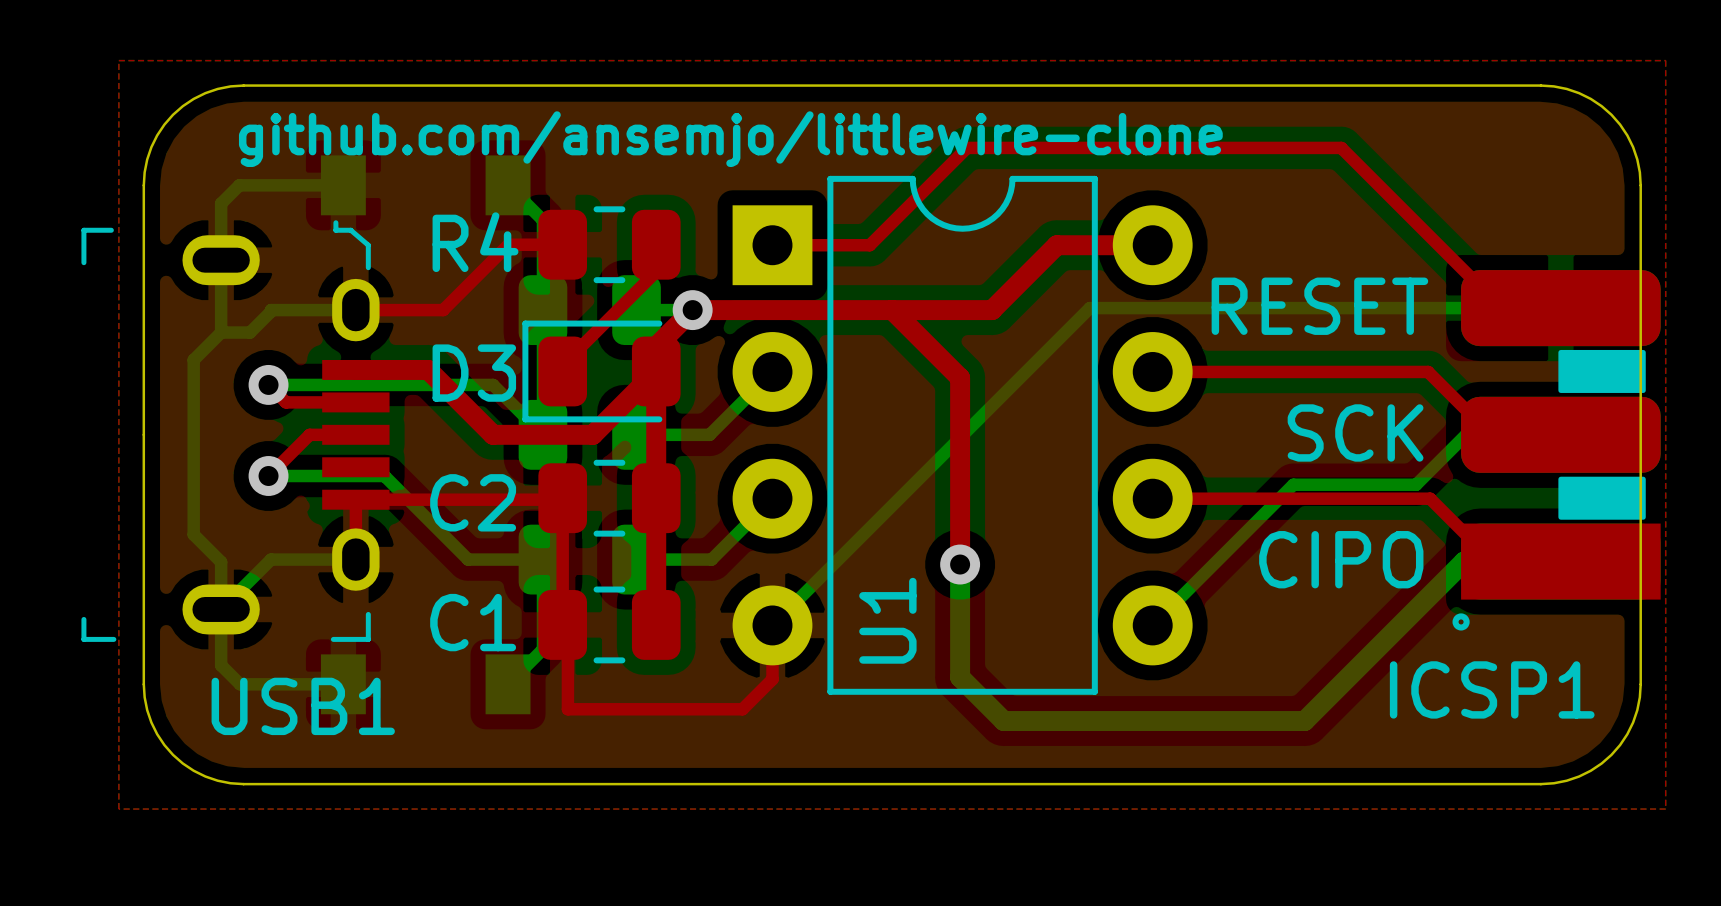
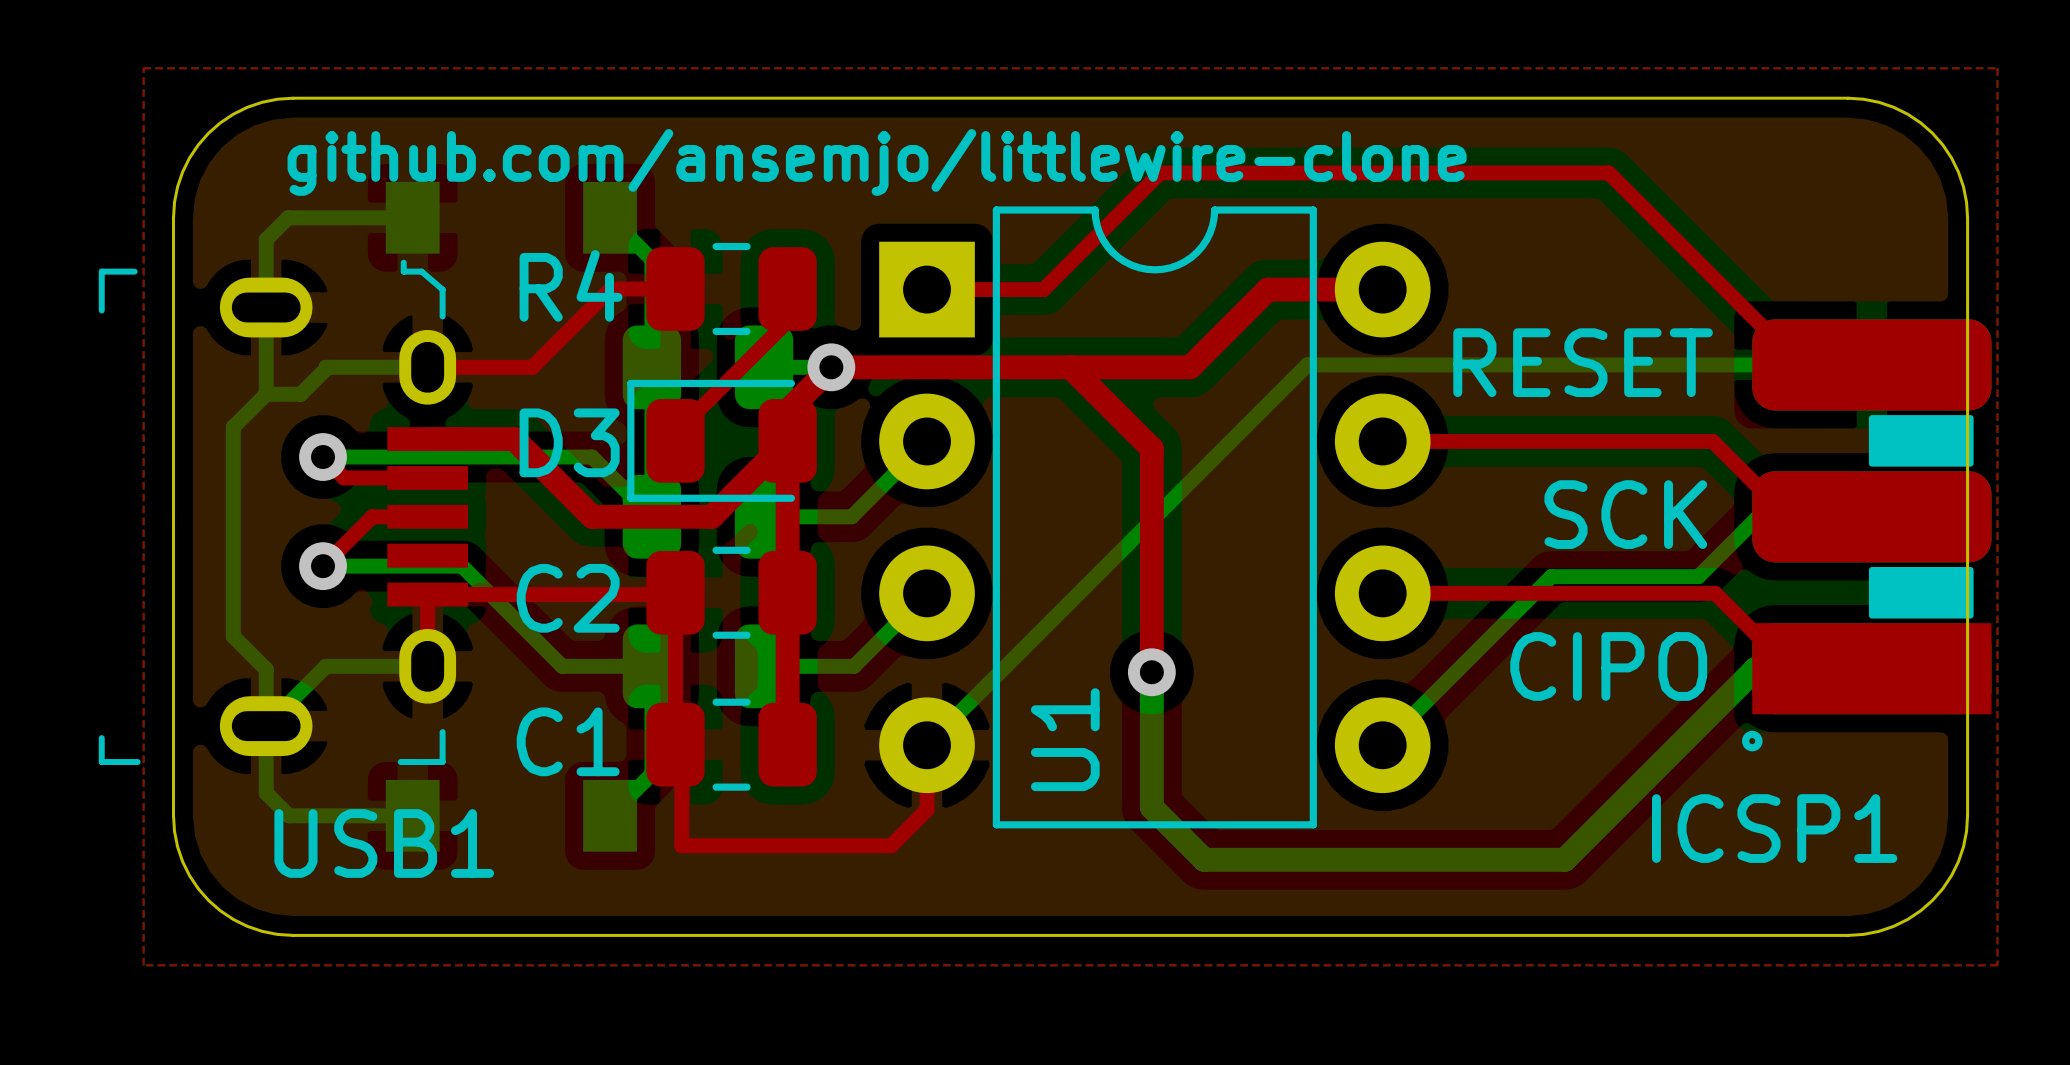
ICSP1 name position: ICSP1 (1492, 689) -> ICSP1 (1774, 828)
USB1 name position: USB1 (303, 706) -> USB1 (384, 843)

